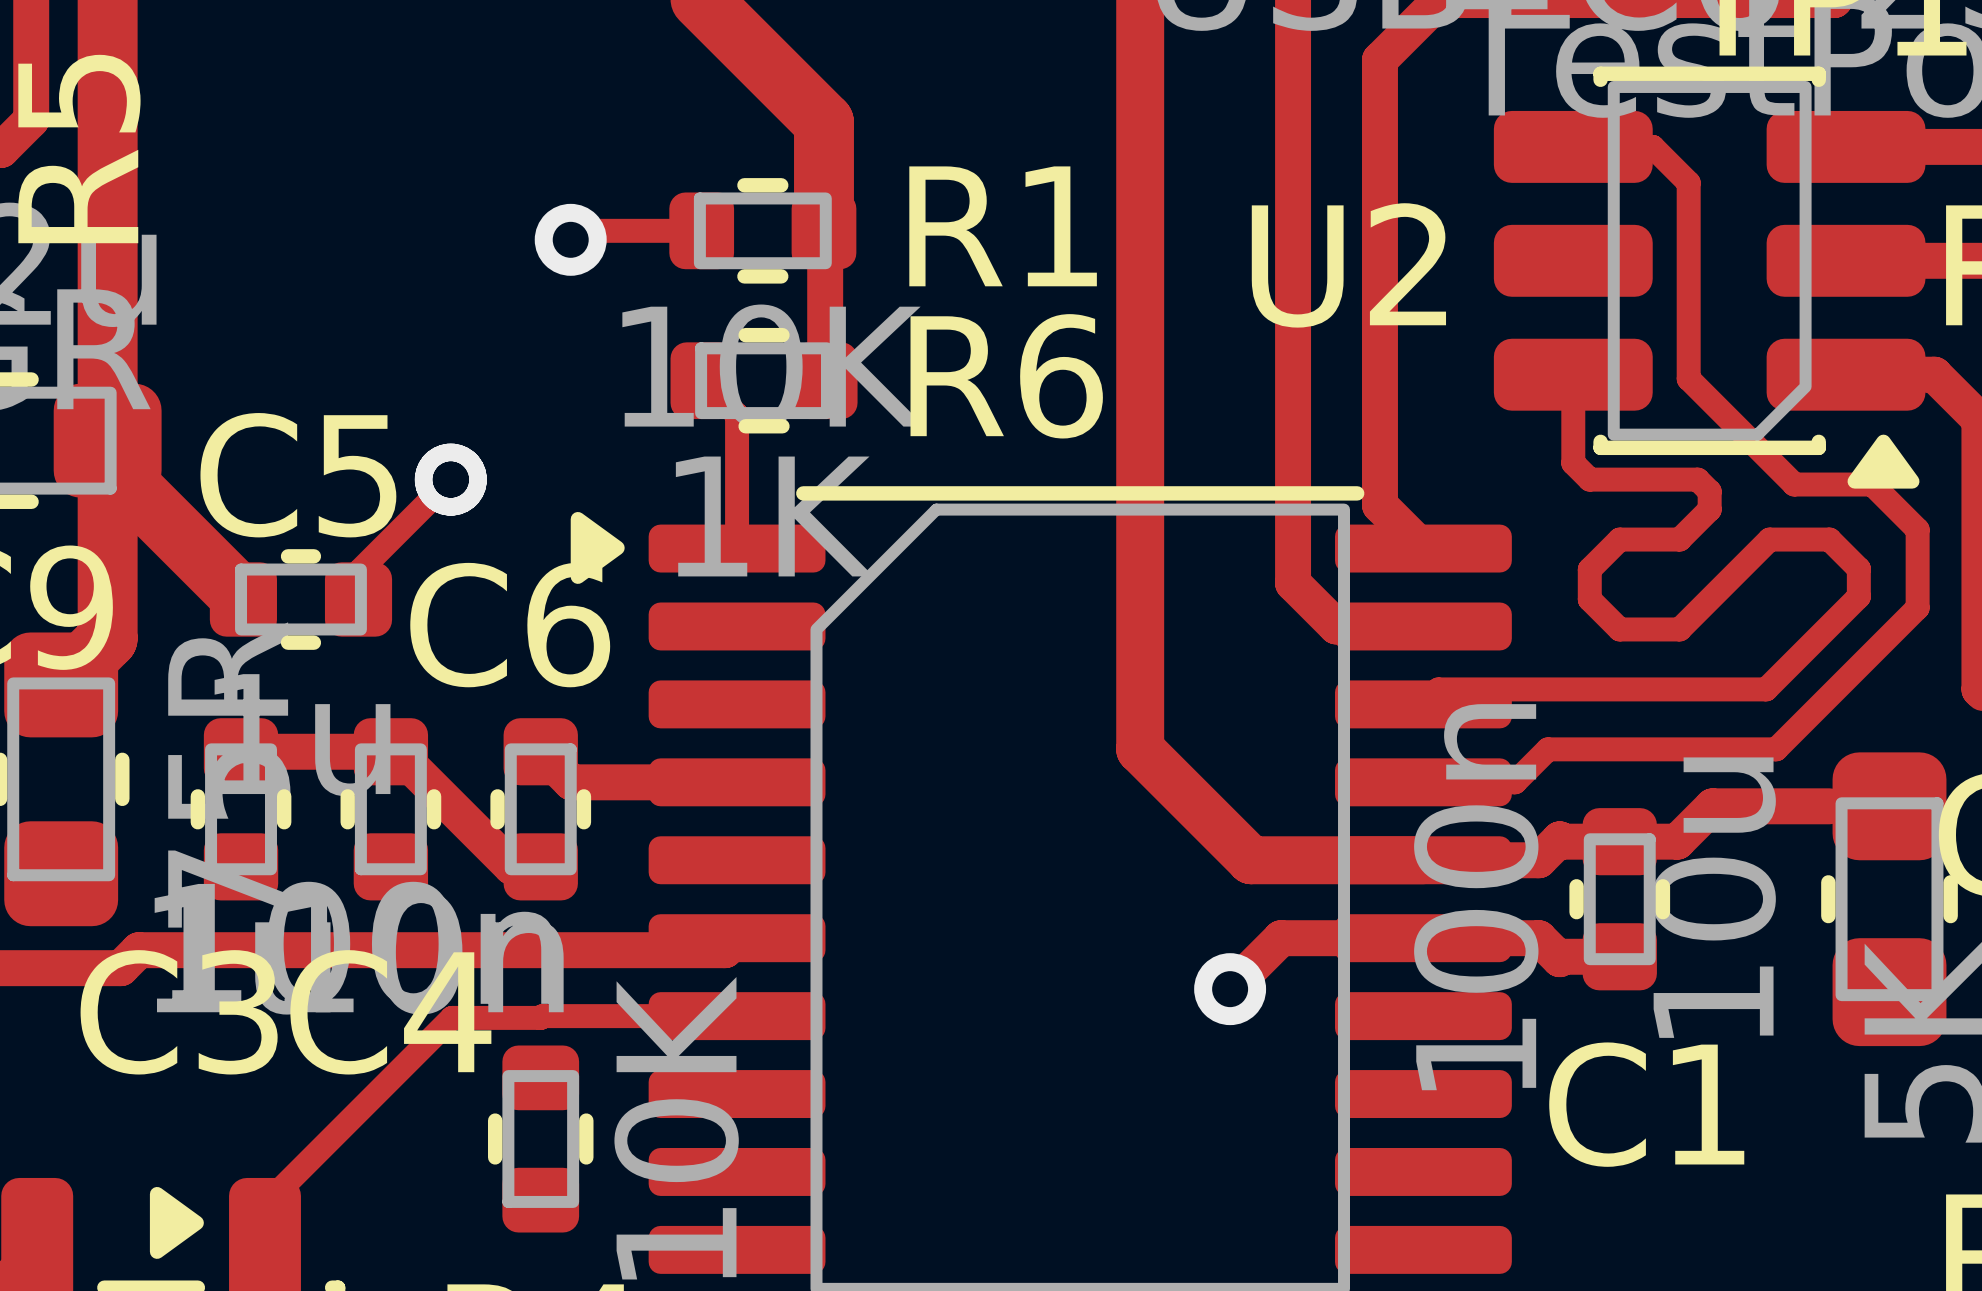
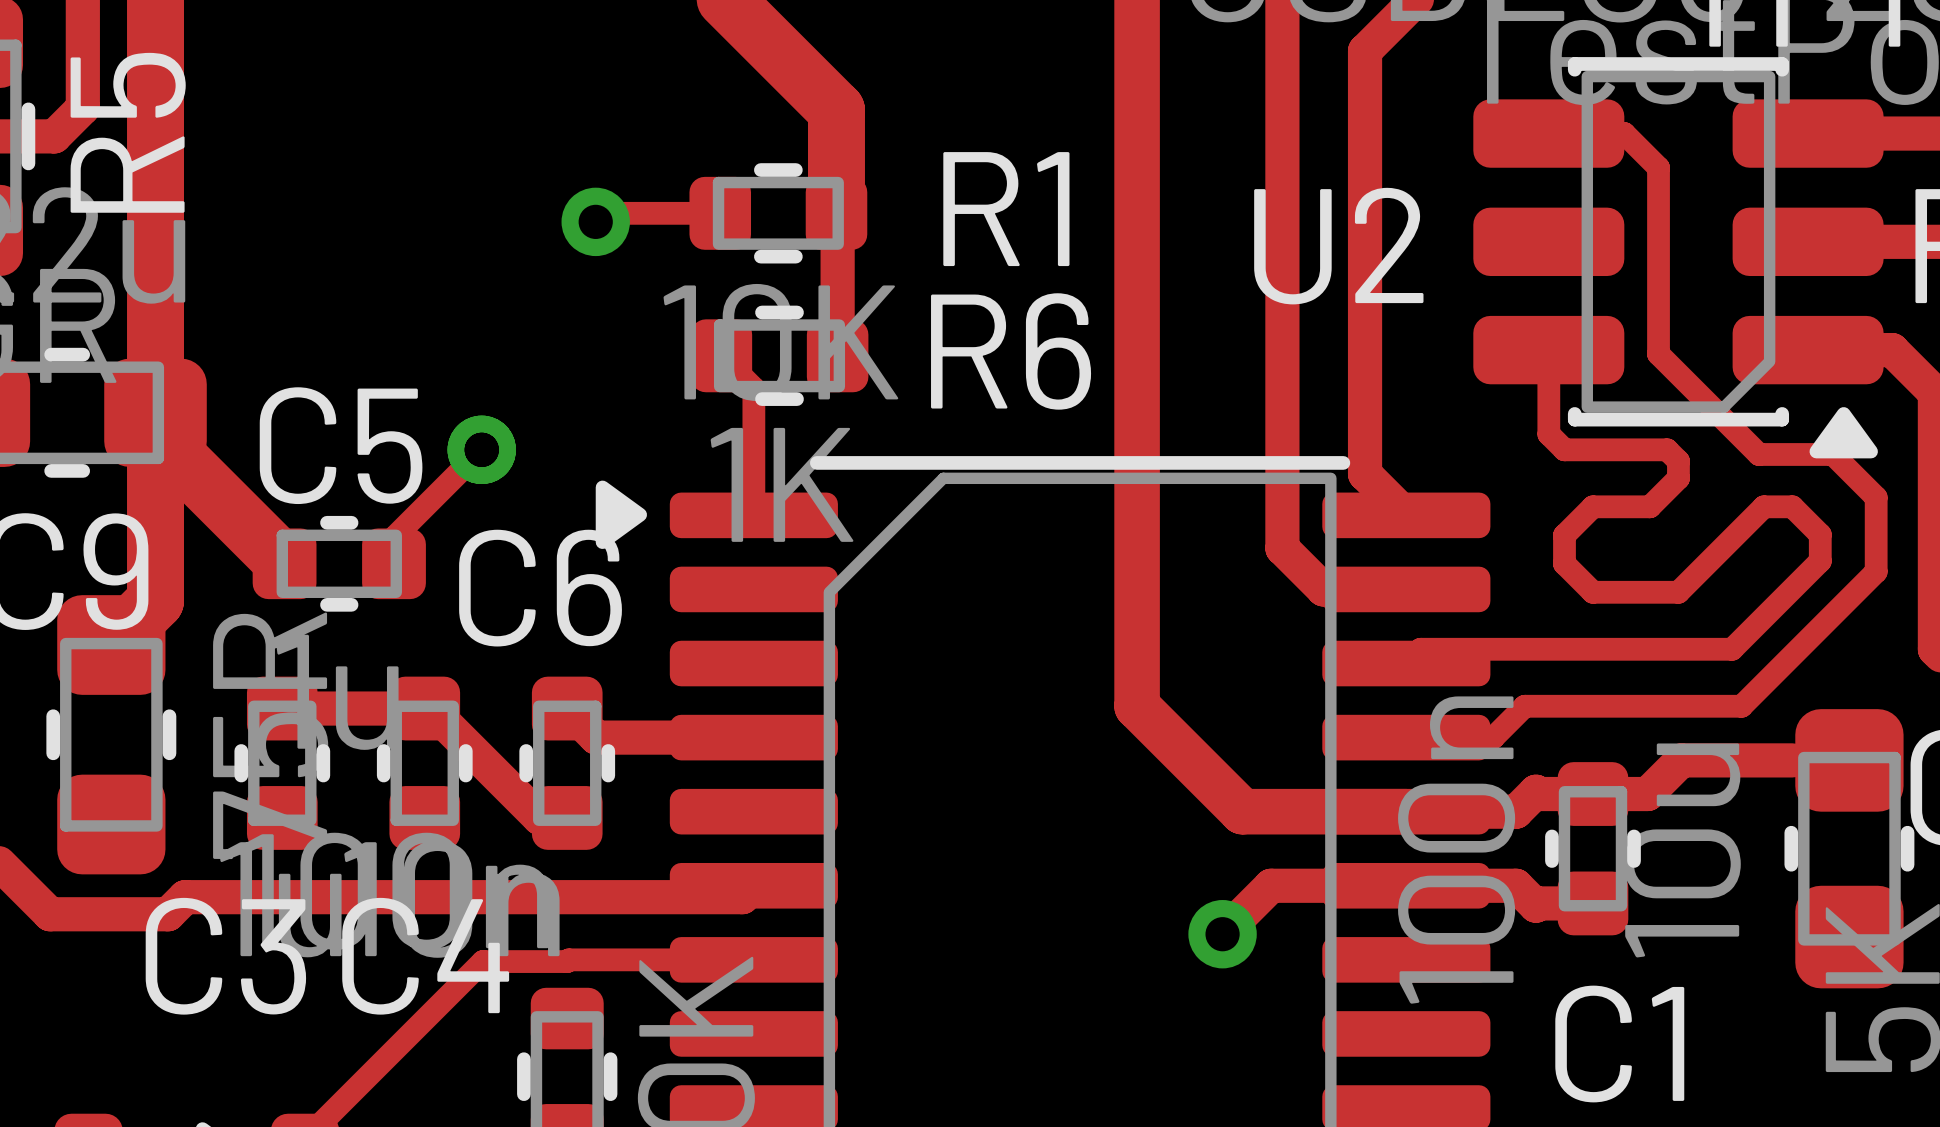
top track: (1799, 539) (1769, 539) (1679, 629) -> (1763, 506) (1678, 592) (1649, 592)

